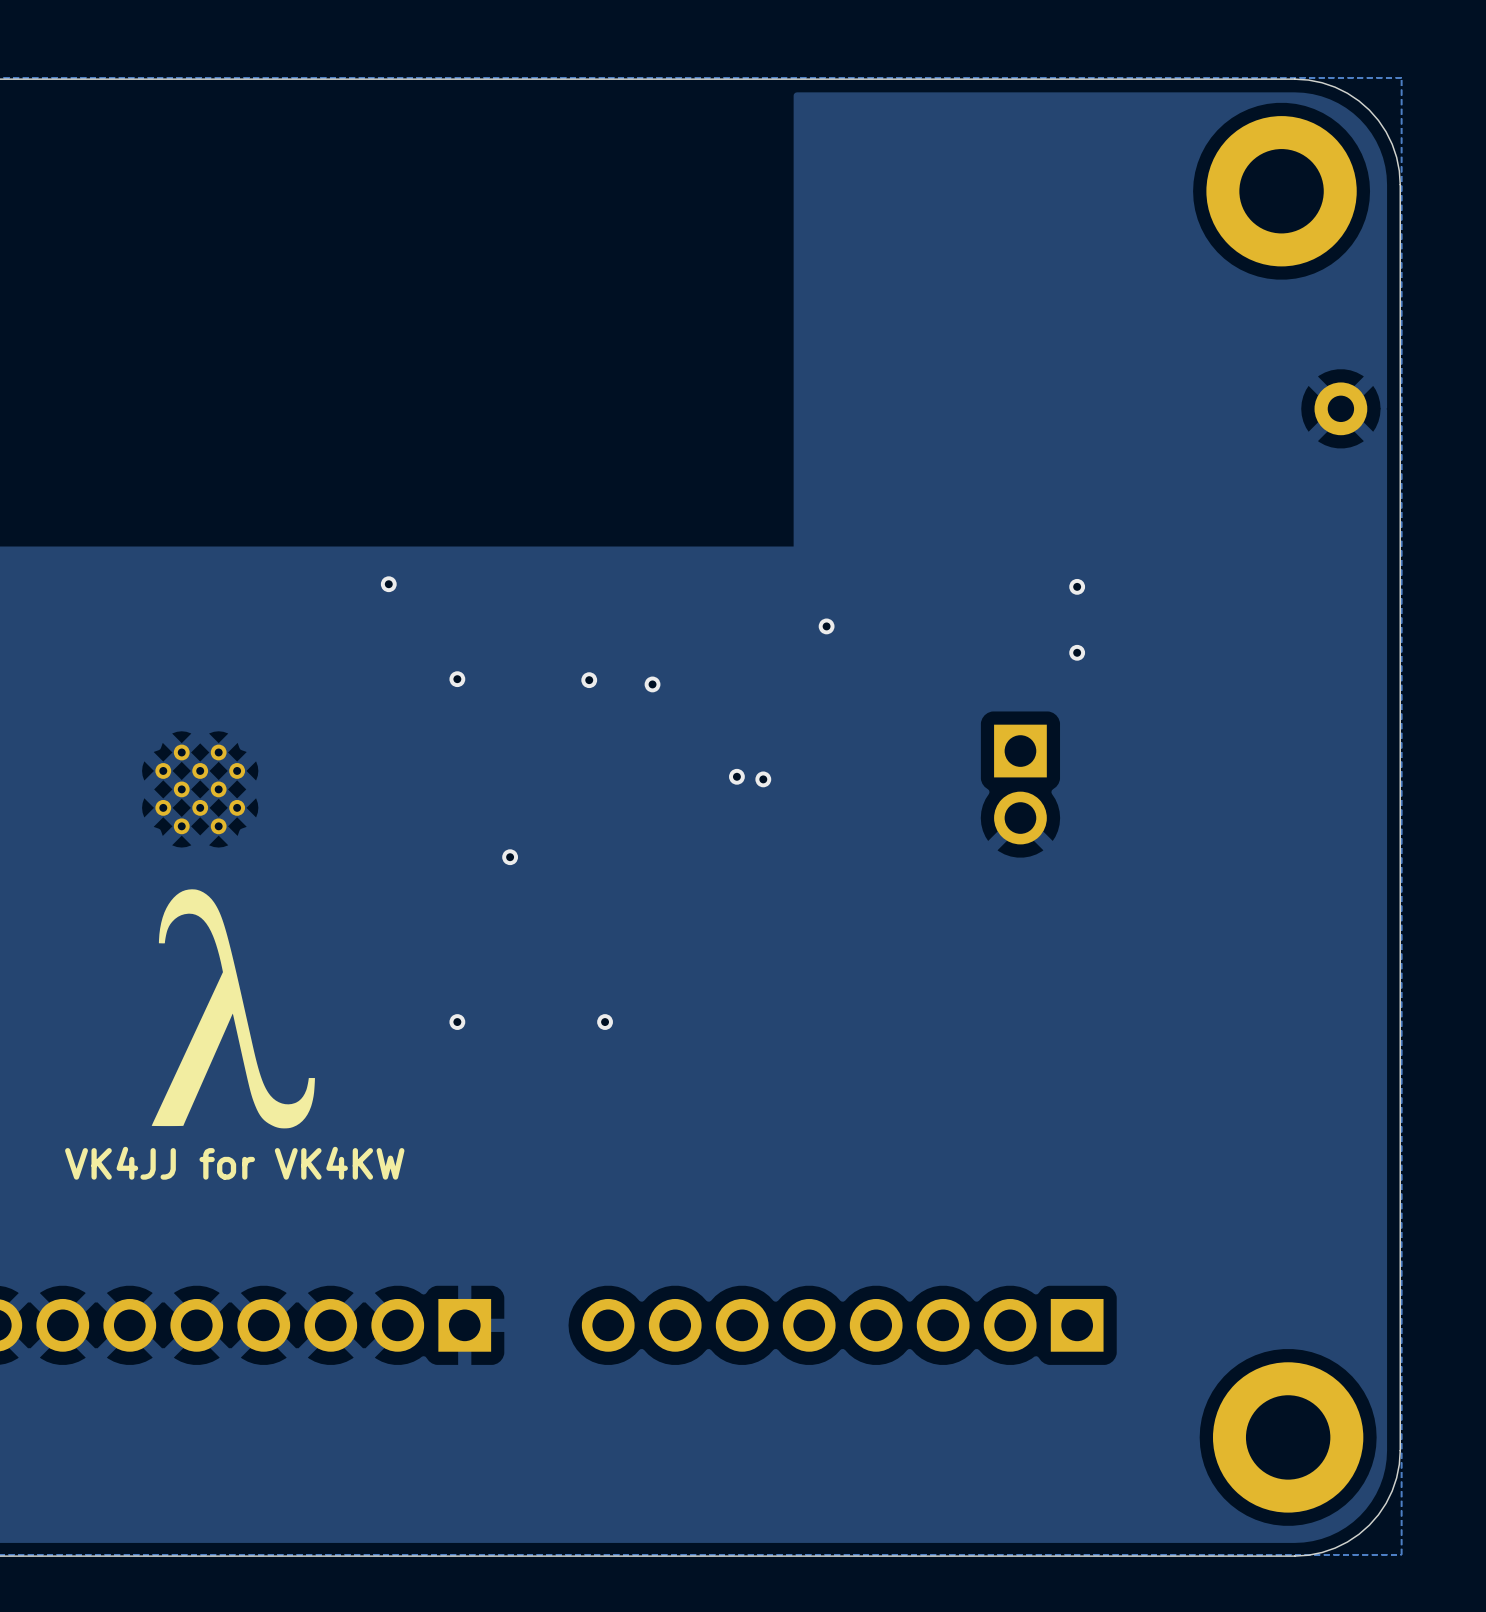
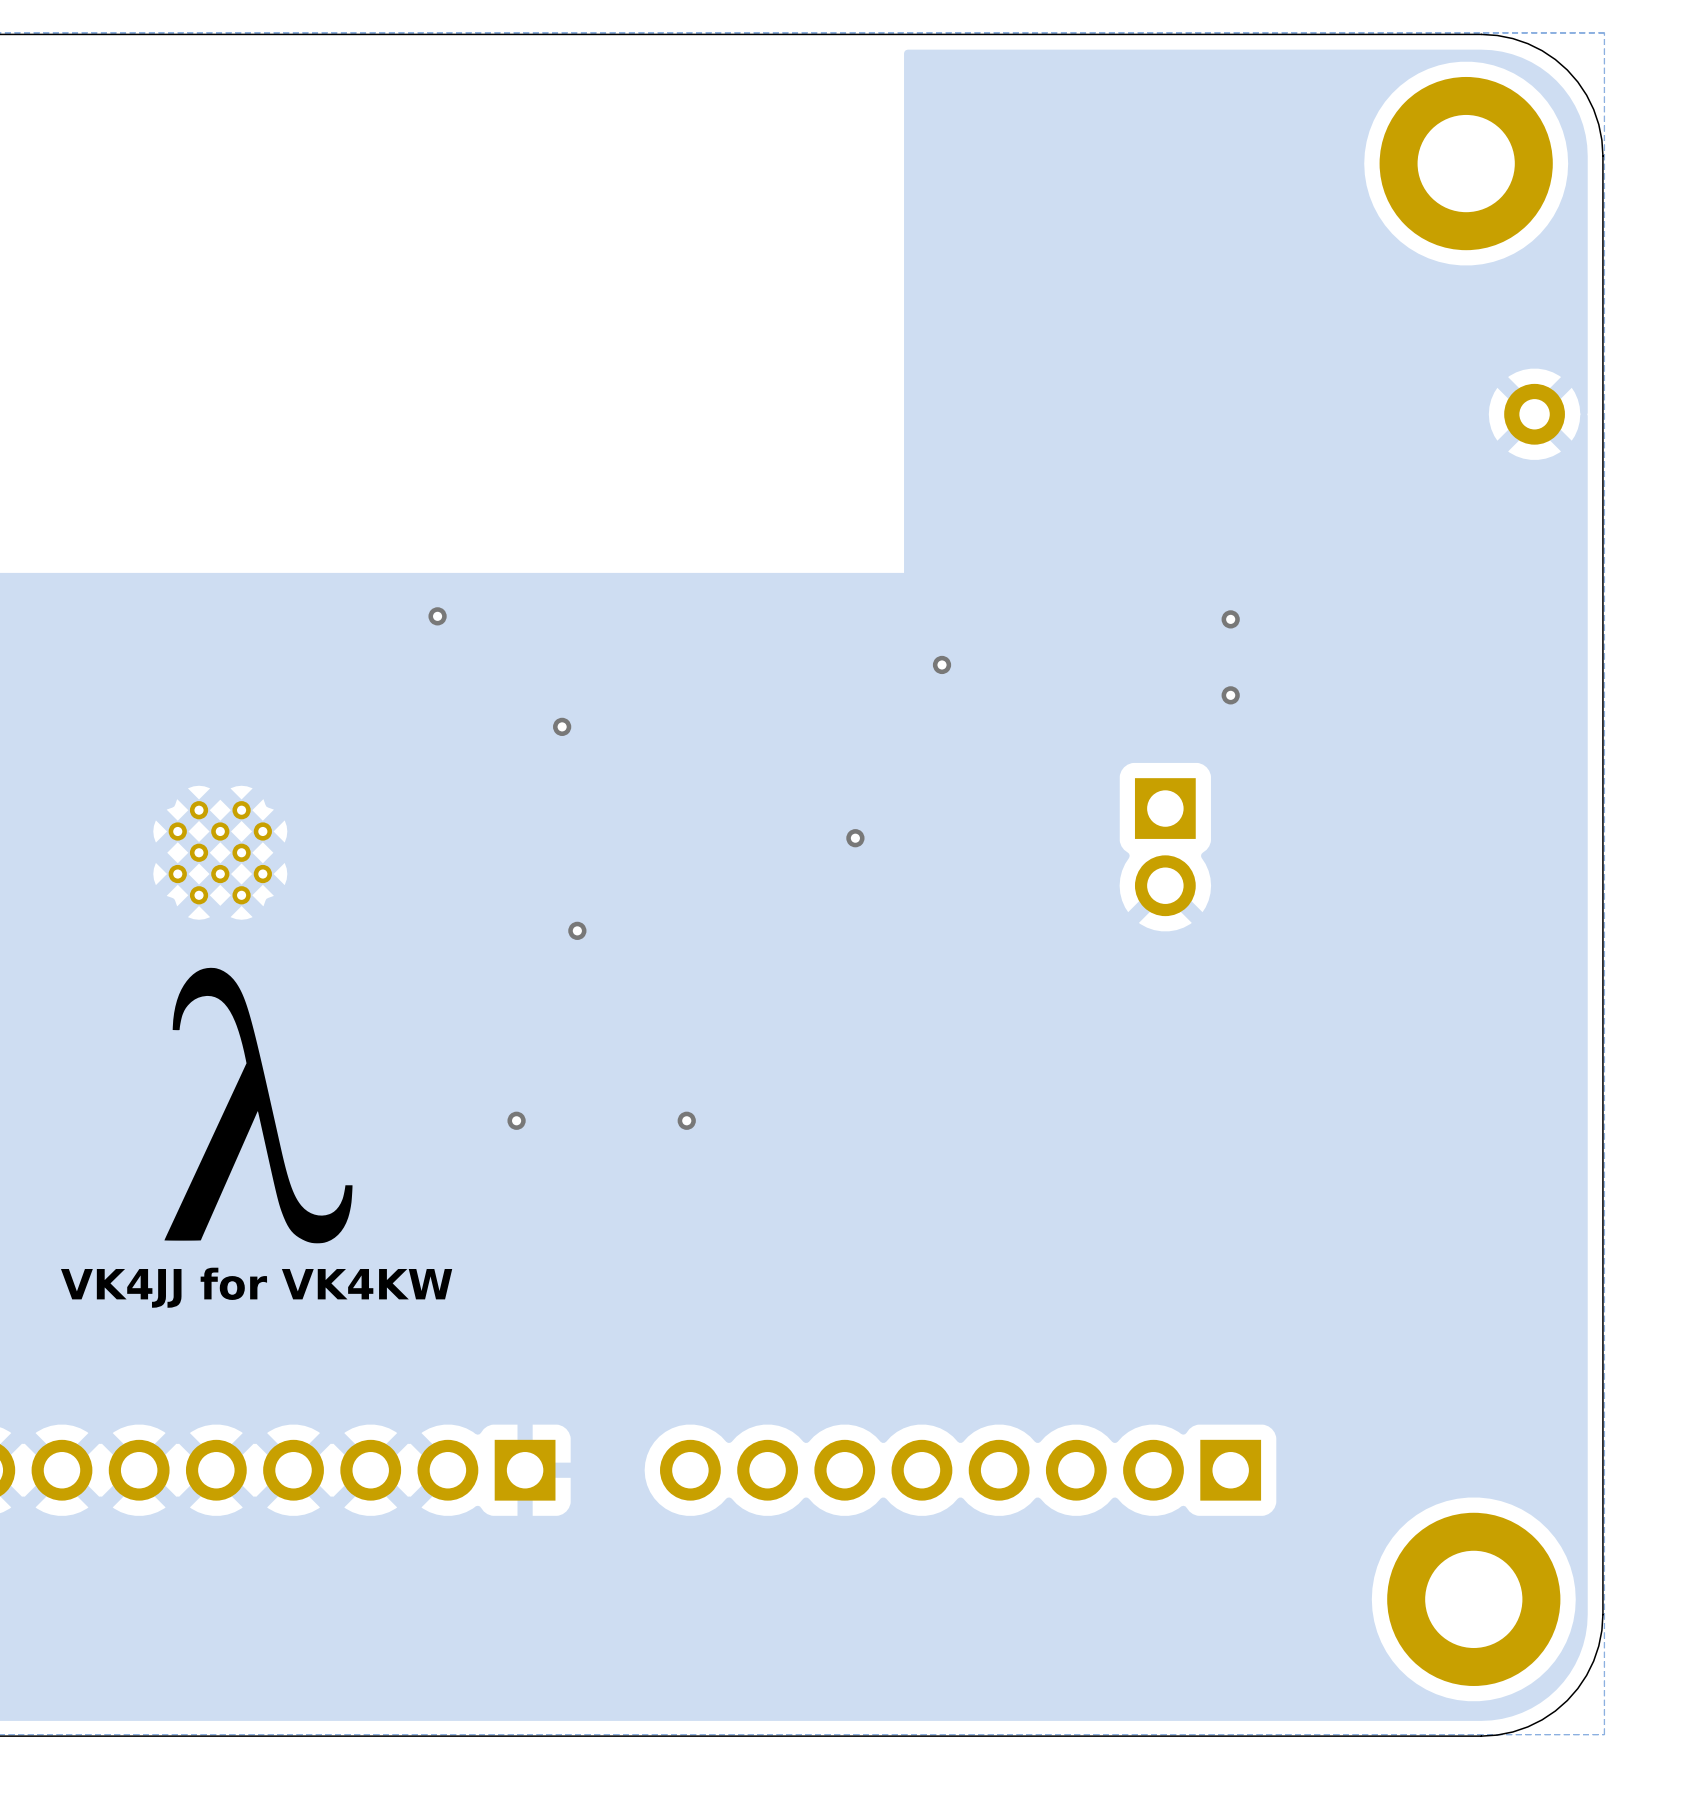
via position: (457, 679) -> (562, 726)
via: (589, 680) -> none
via: (652, 684) -> none
via: (736, 776) -> none
via: none -> (855, 838)
via: (763, 779) -> none

